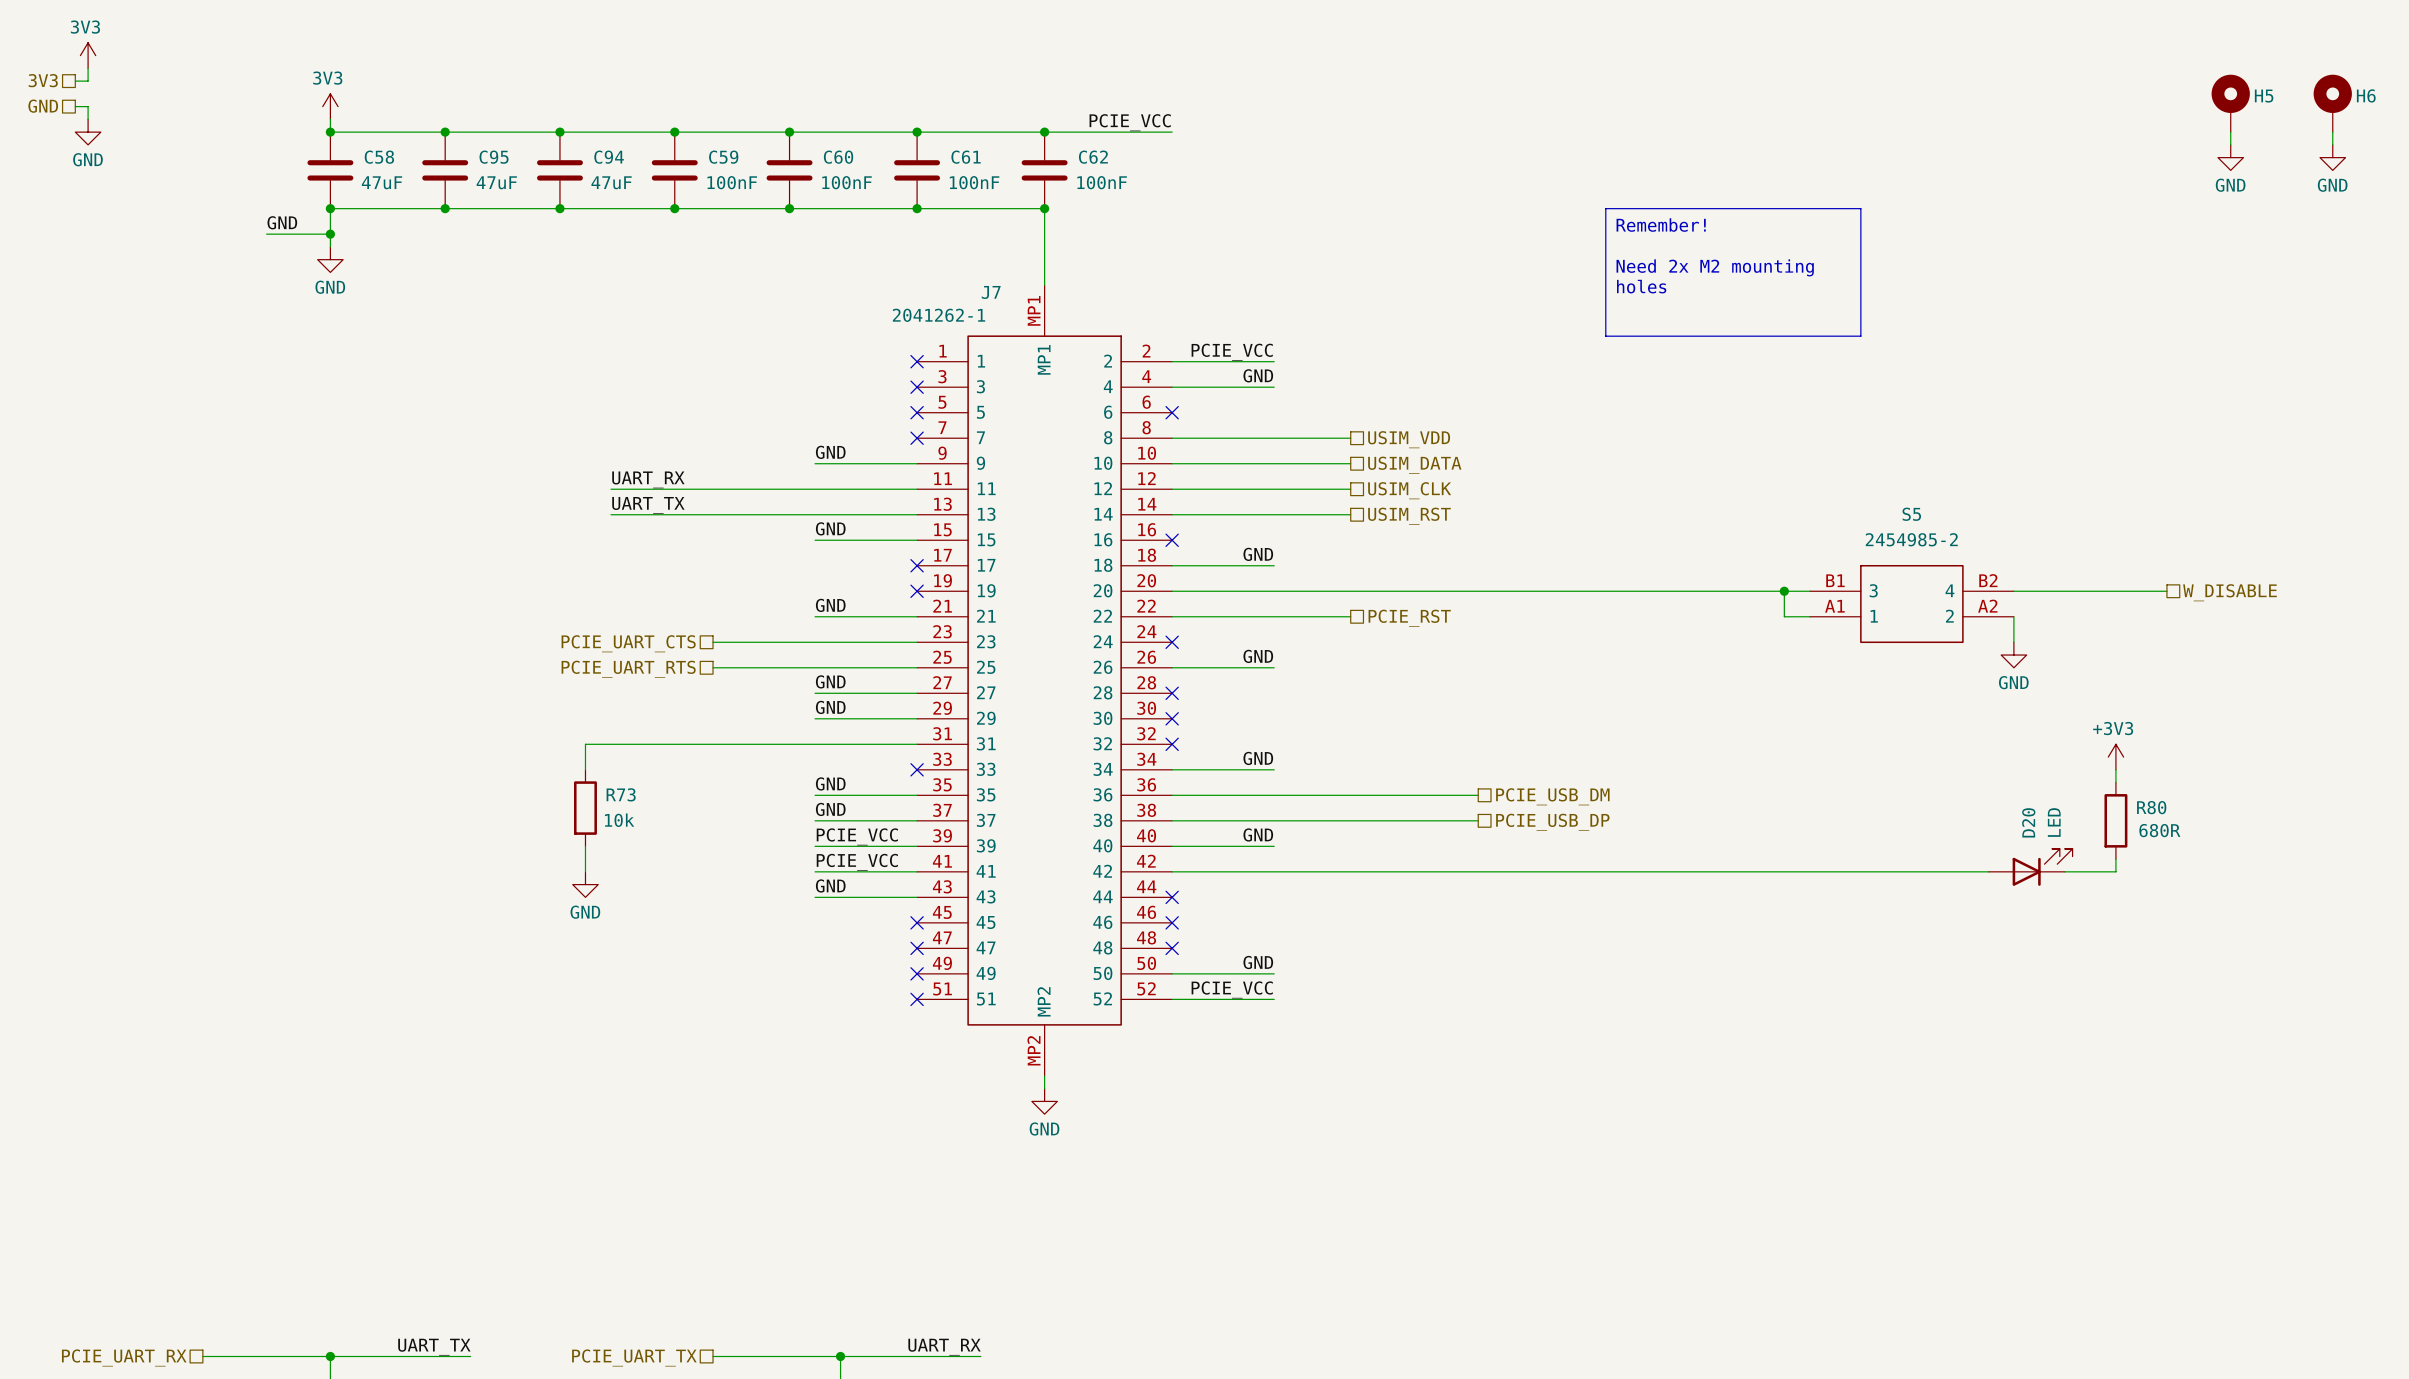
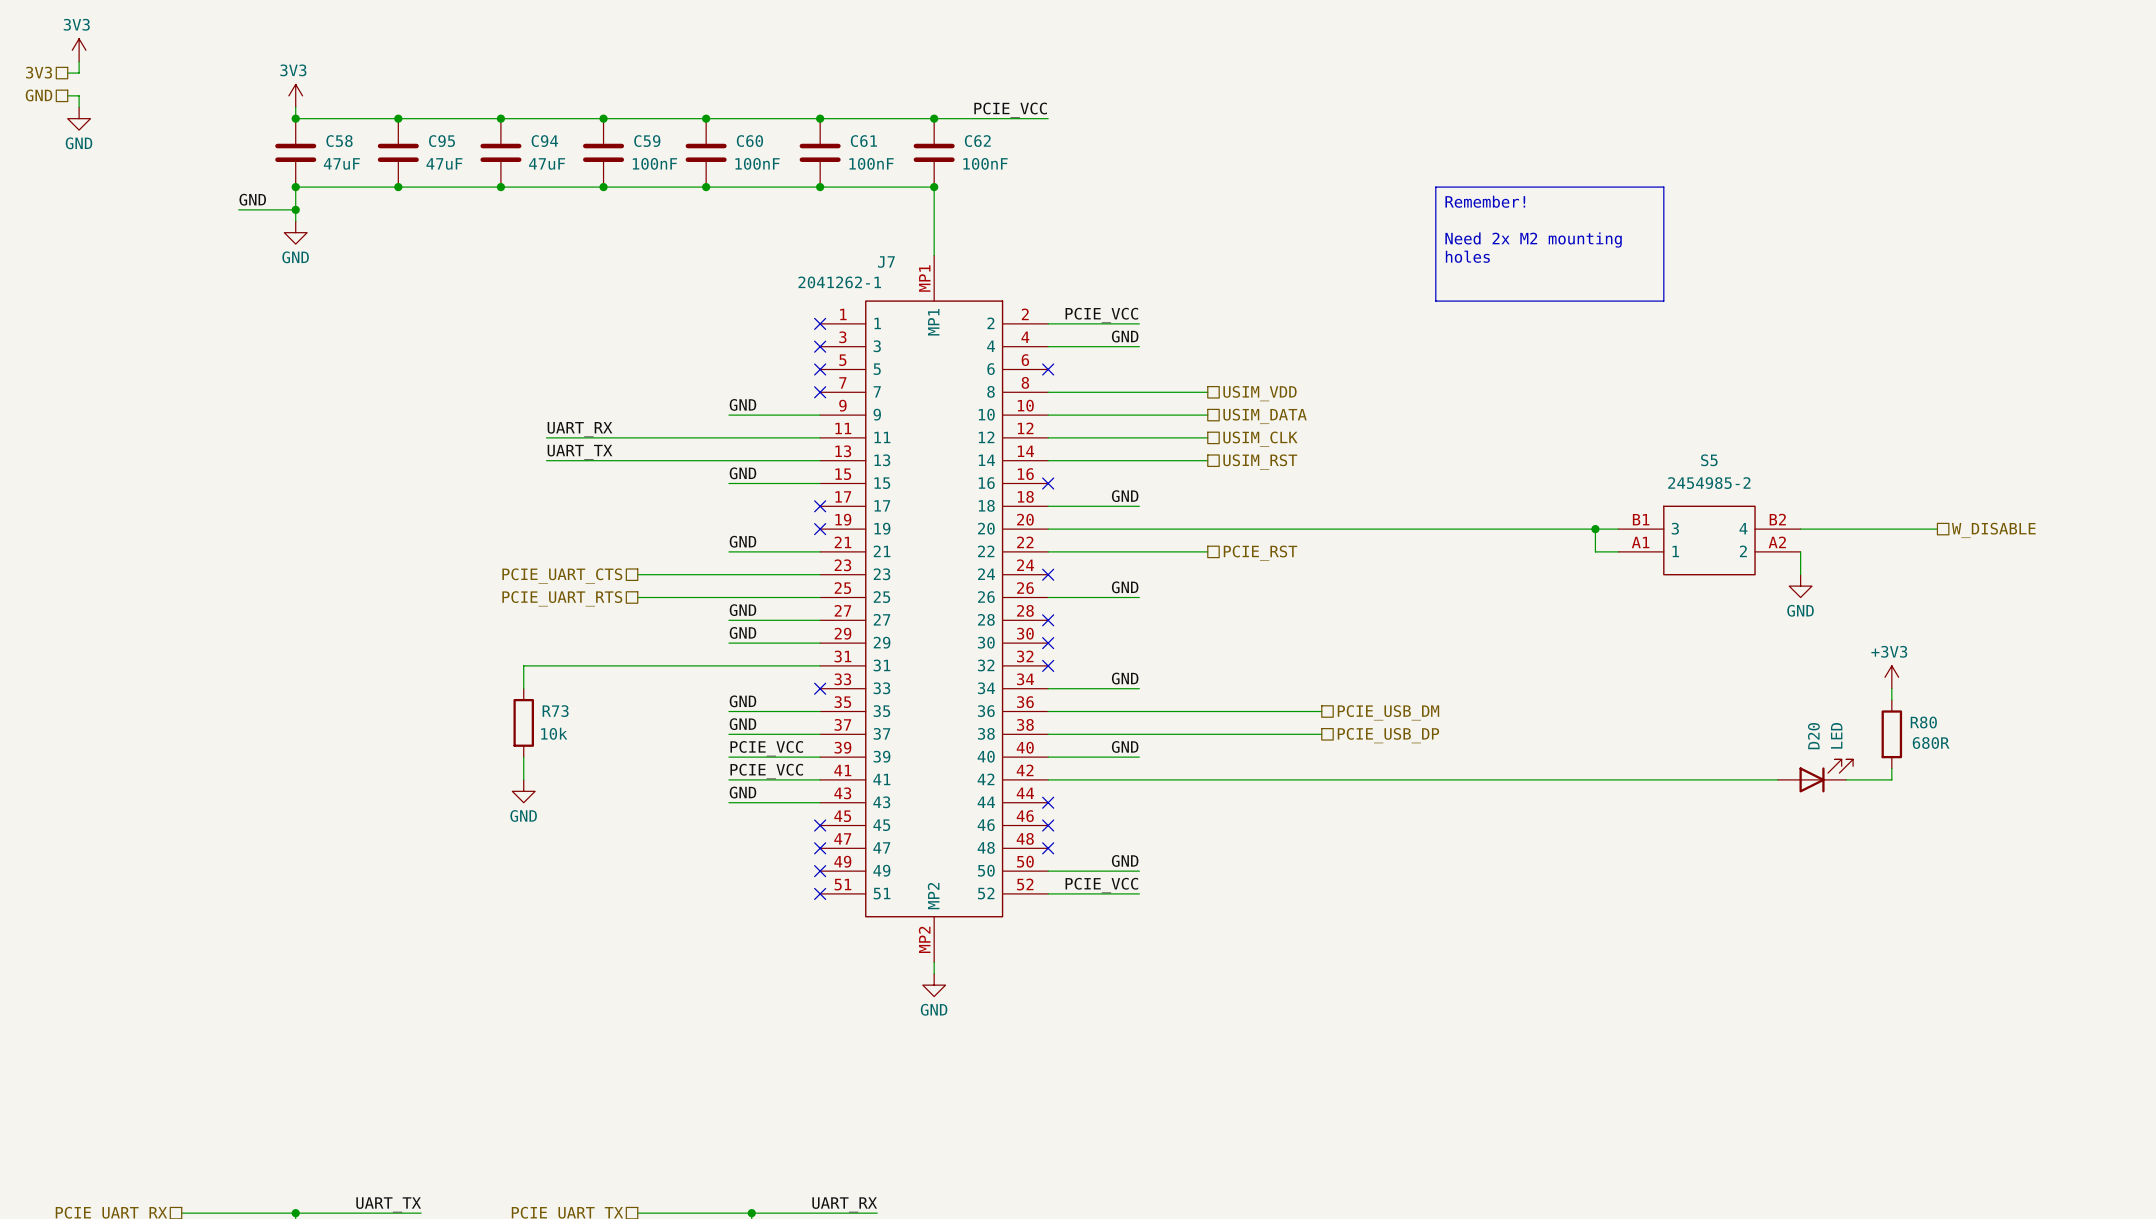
H5: (2230, 103) -> none
H6: (2332, 103) -> none
wire: (2230, 132) (2230, 144) -> none
wire: (2332, 132) (2332, 144) -> none
power symbol: GND (2230, 157) -> none
power symbol: GND (2332, 157) -> none

